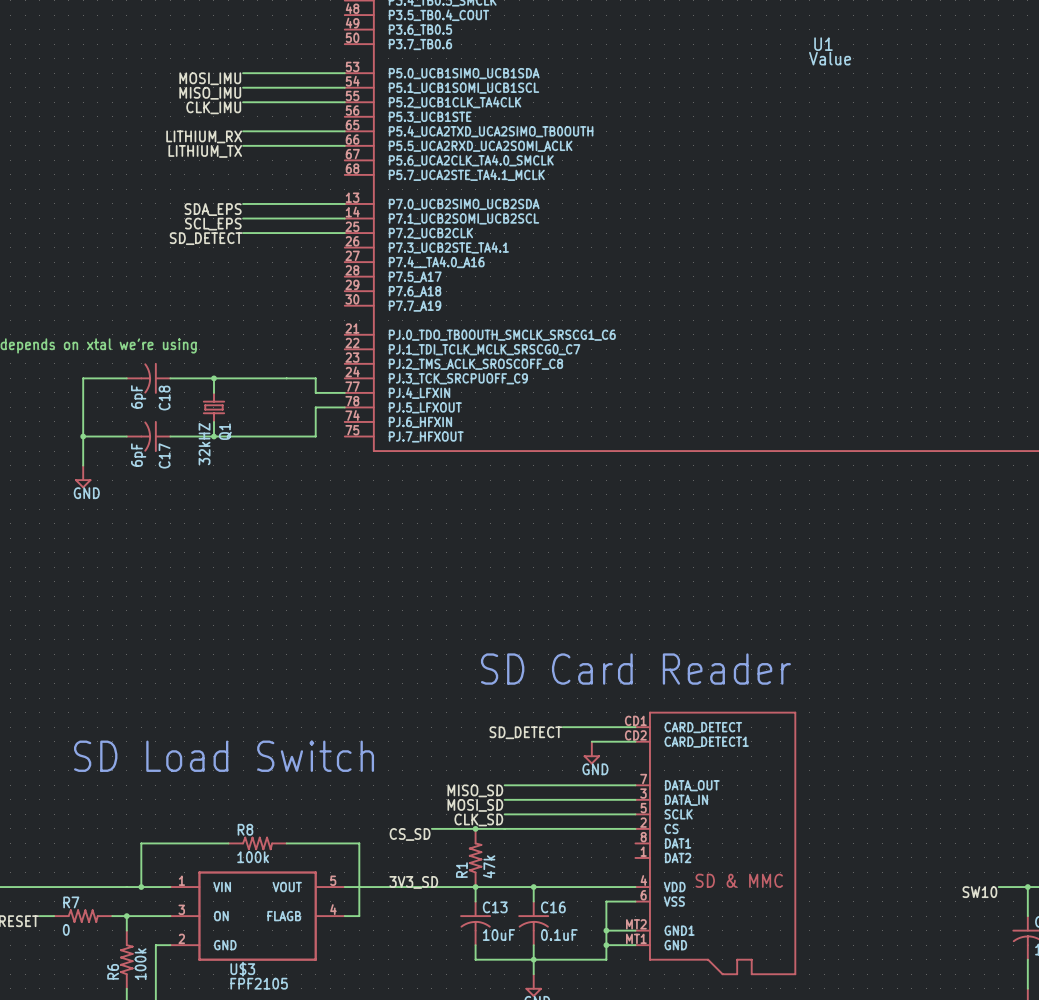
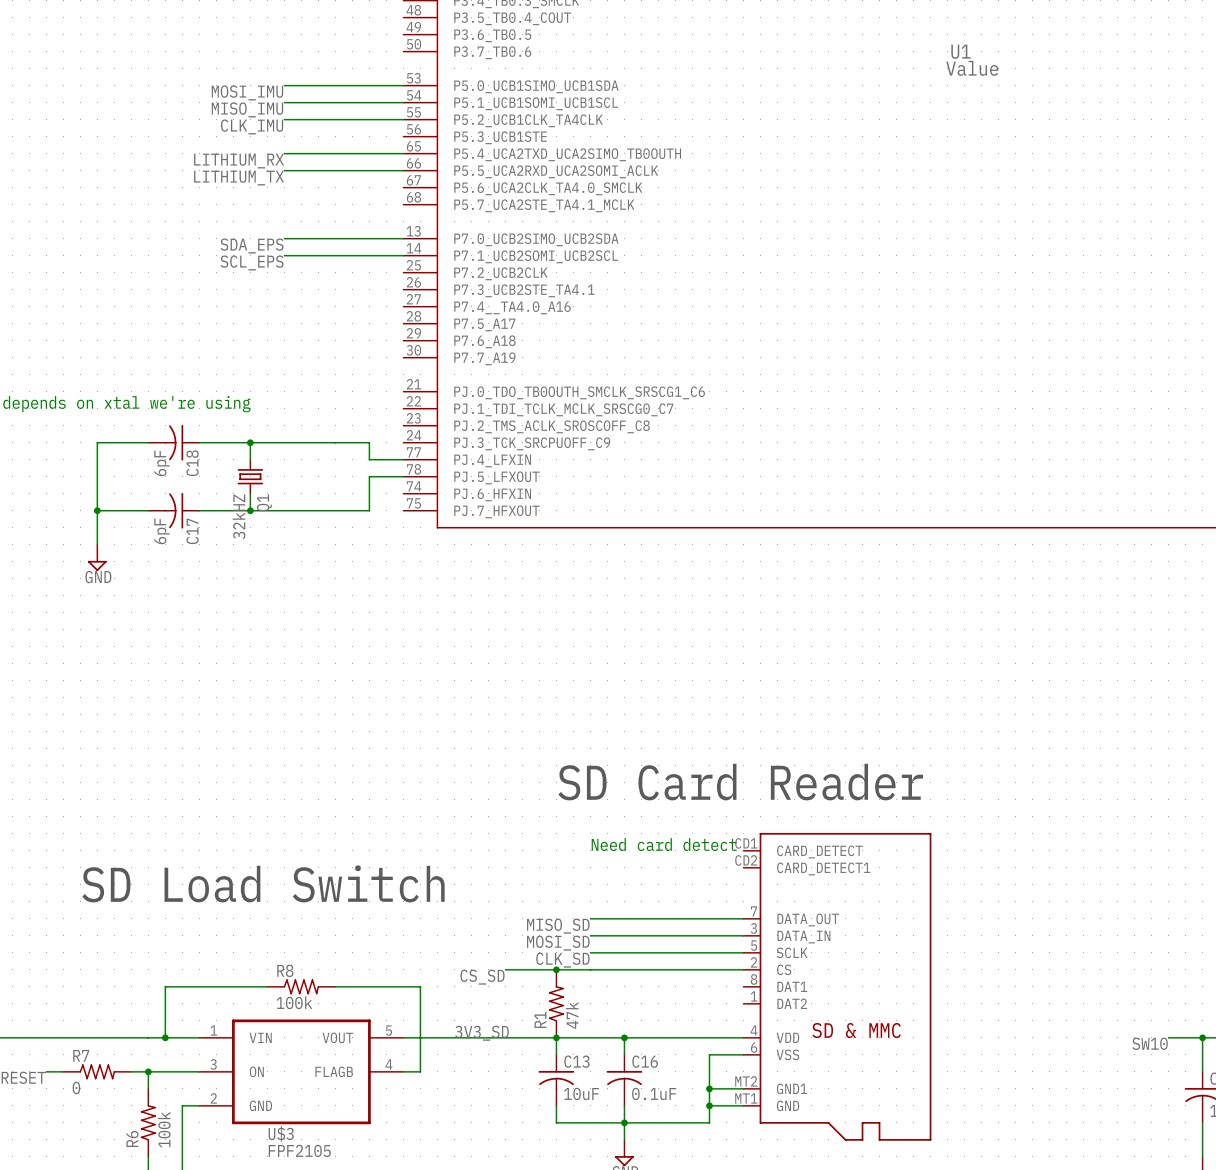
wire: (243, 233) (344, 233) -> none
label: SD_DETECT (206, 238) -> none
text: none -> Need card detect (664, 844)
wire: (562, 727) (635, 727) -> none
label: SD_DETECT (525, 732) -> none
wire: (591, 741) (635, 741) -> none
power symbol: GND (591, 752) -> none

